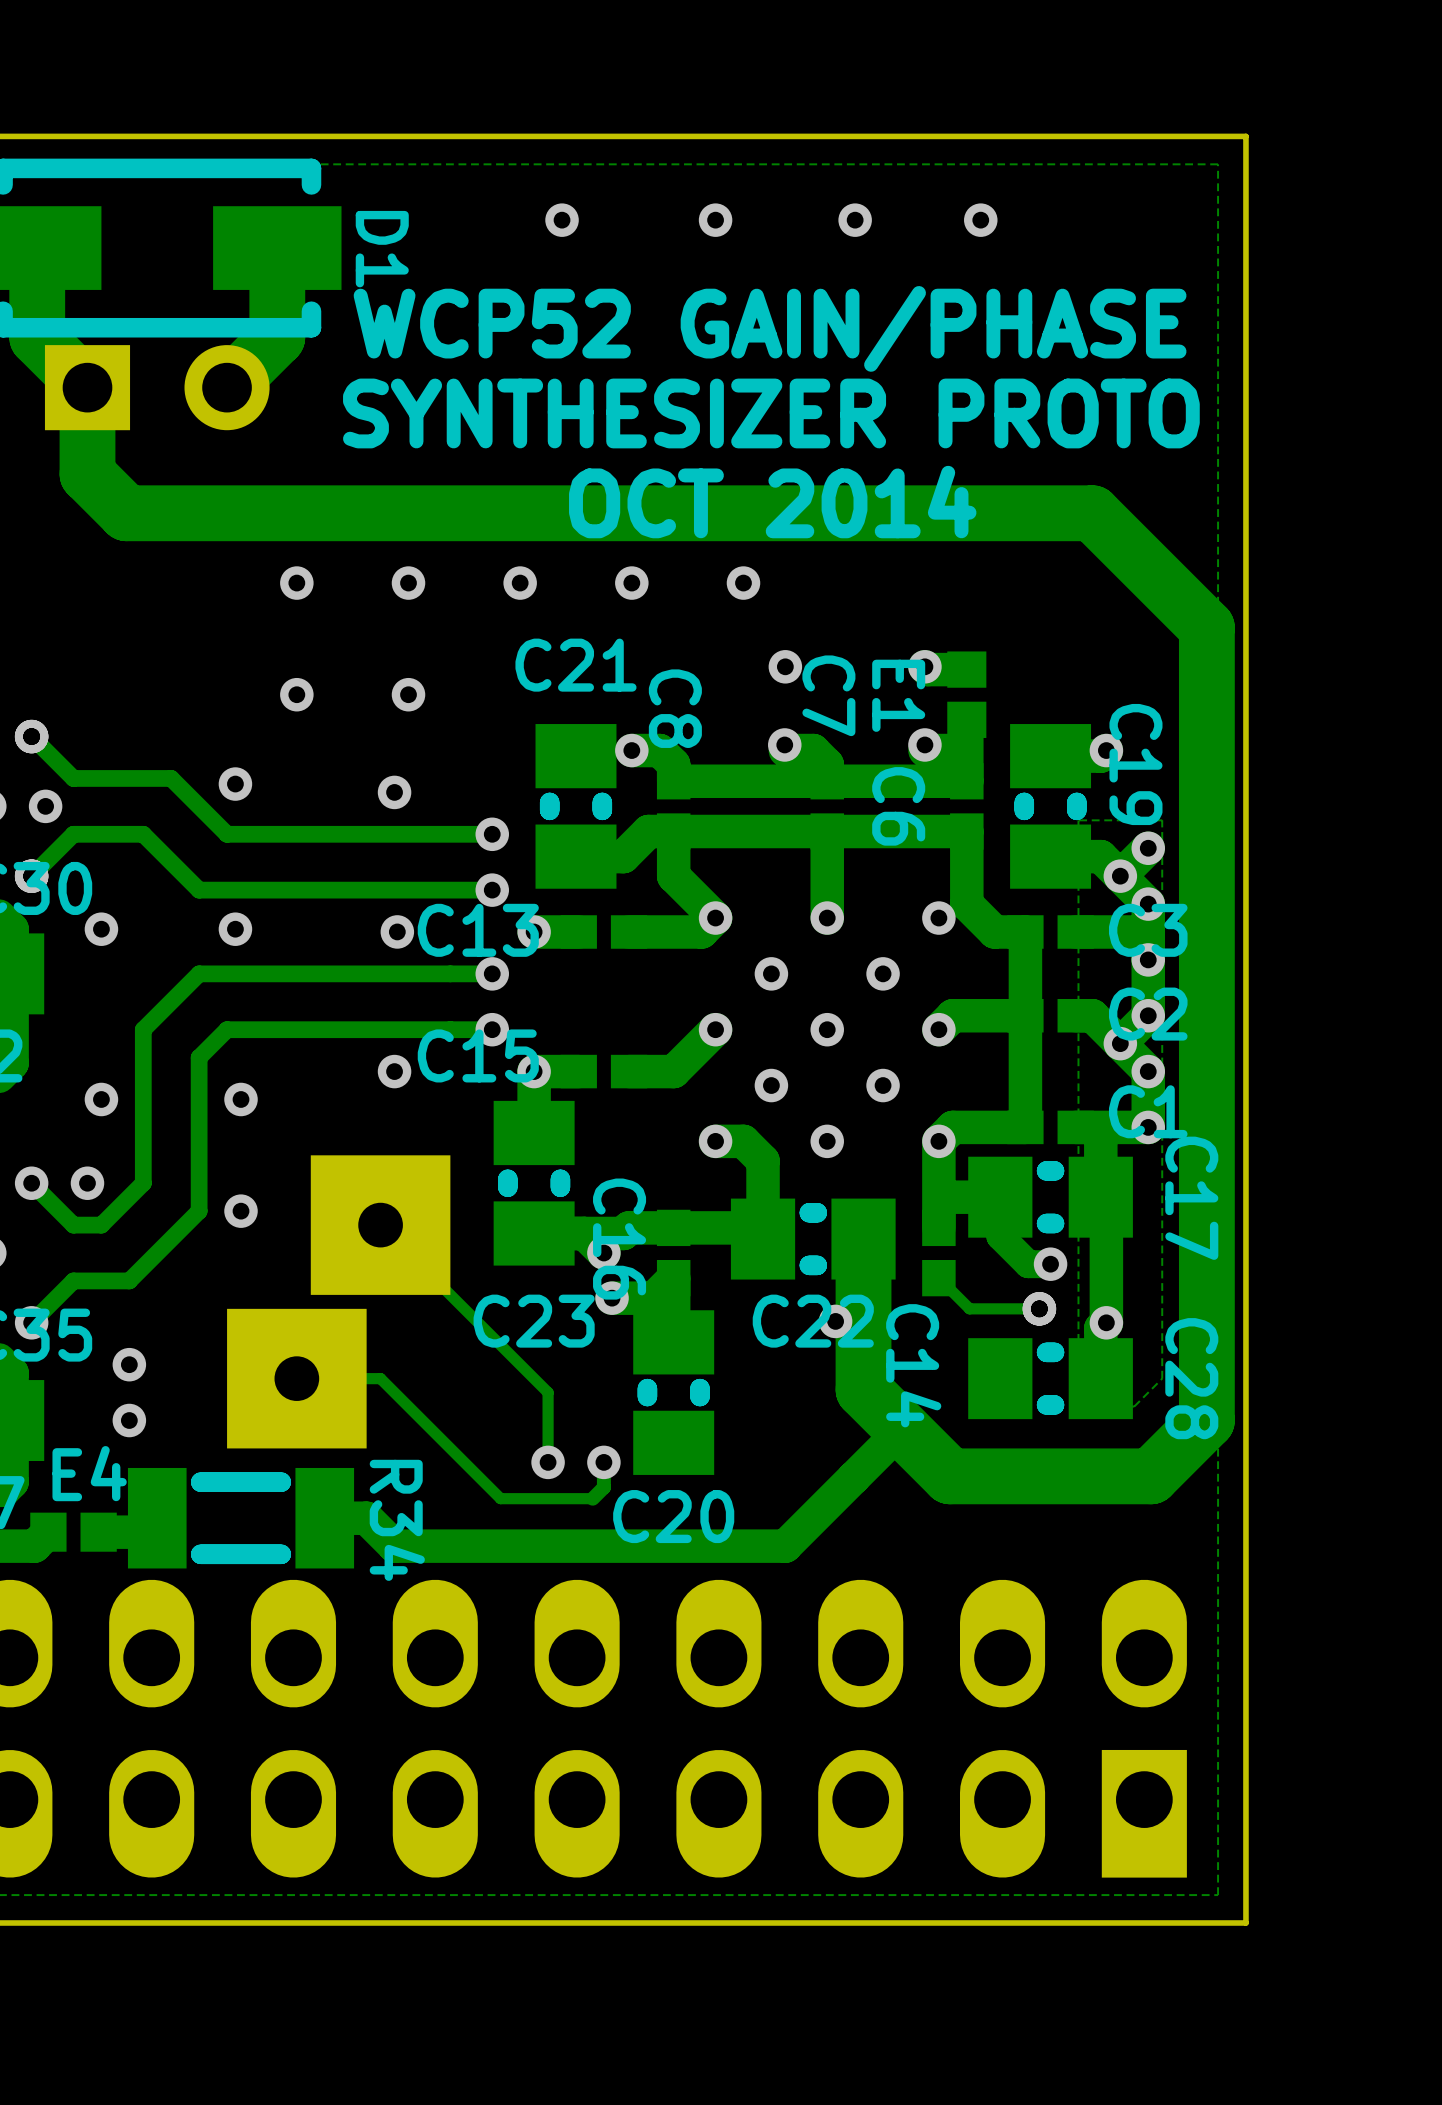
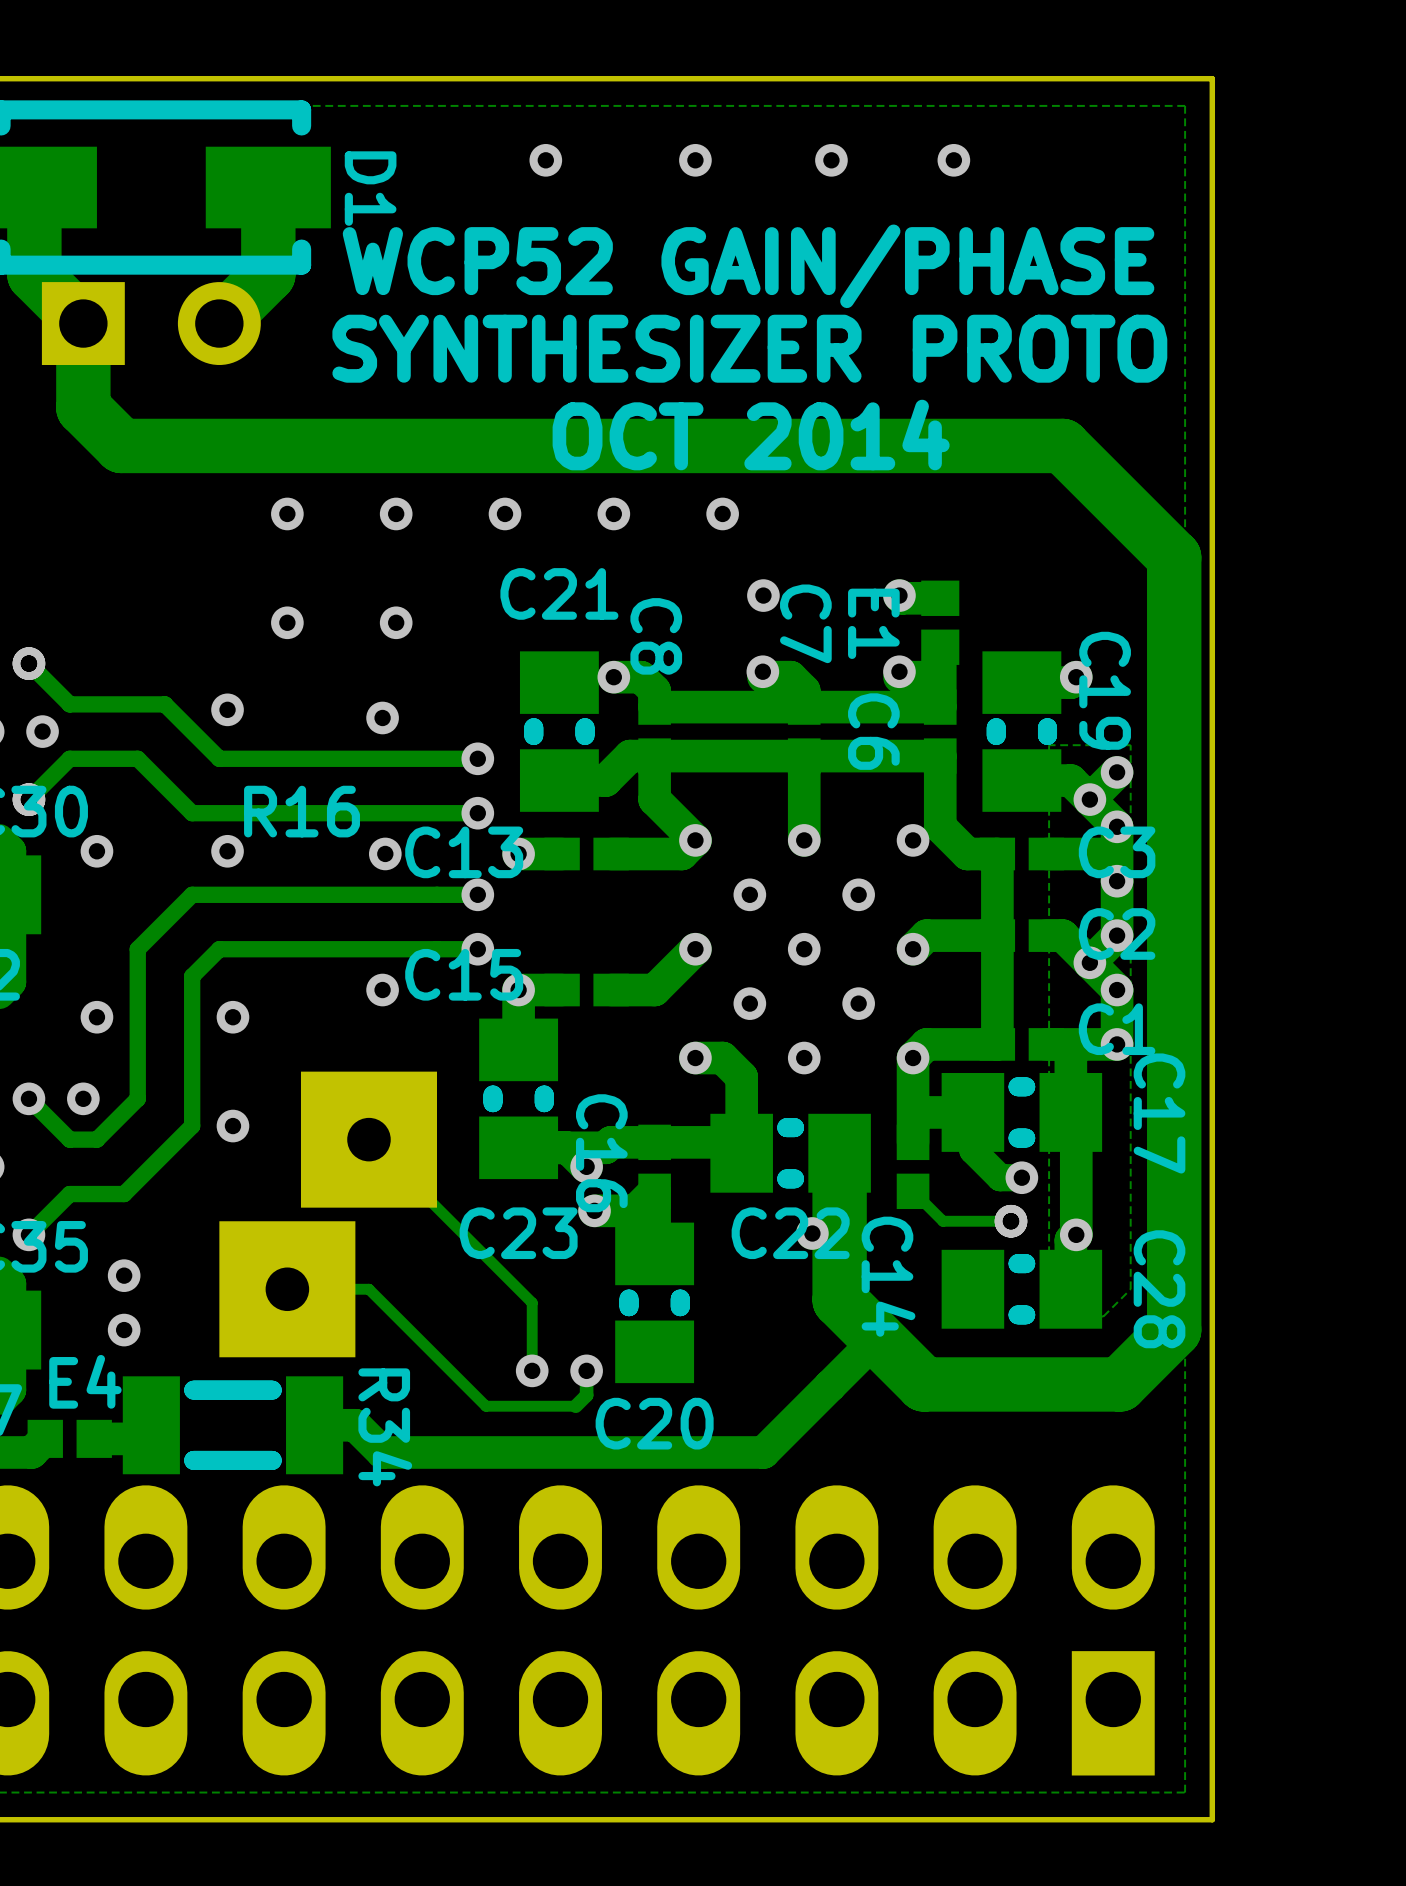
R16: none -> (302, 811)

